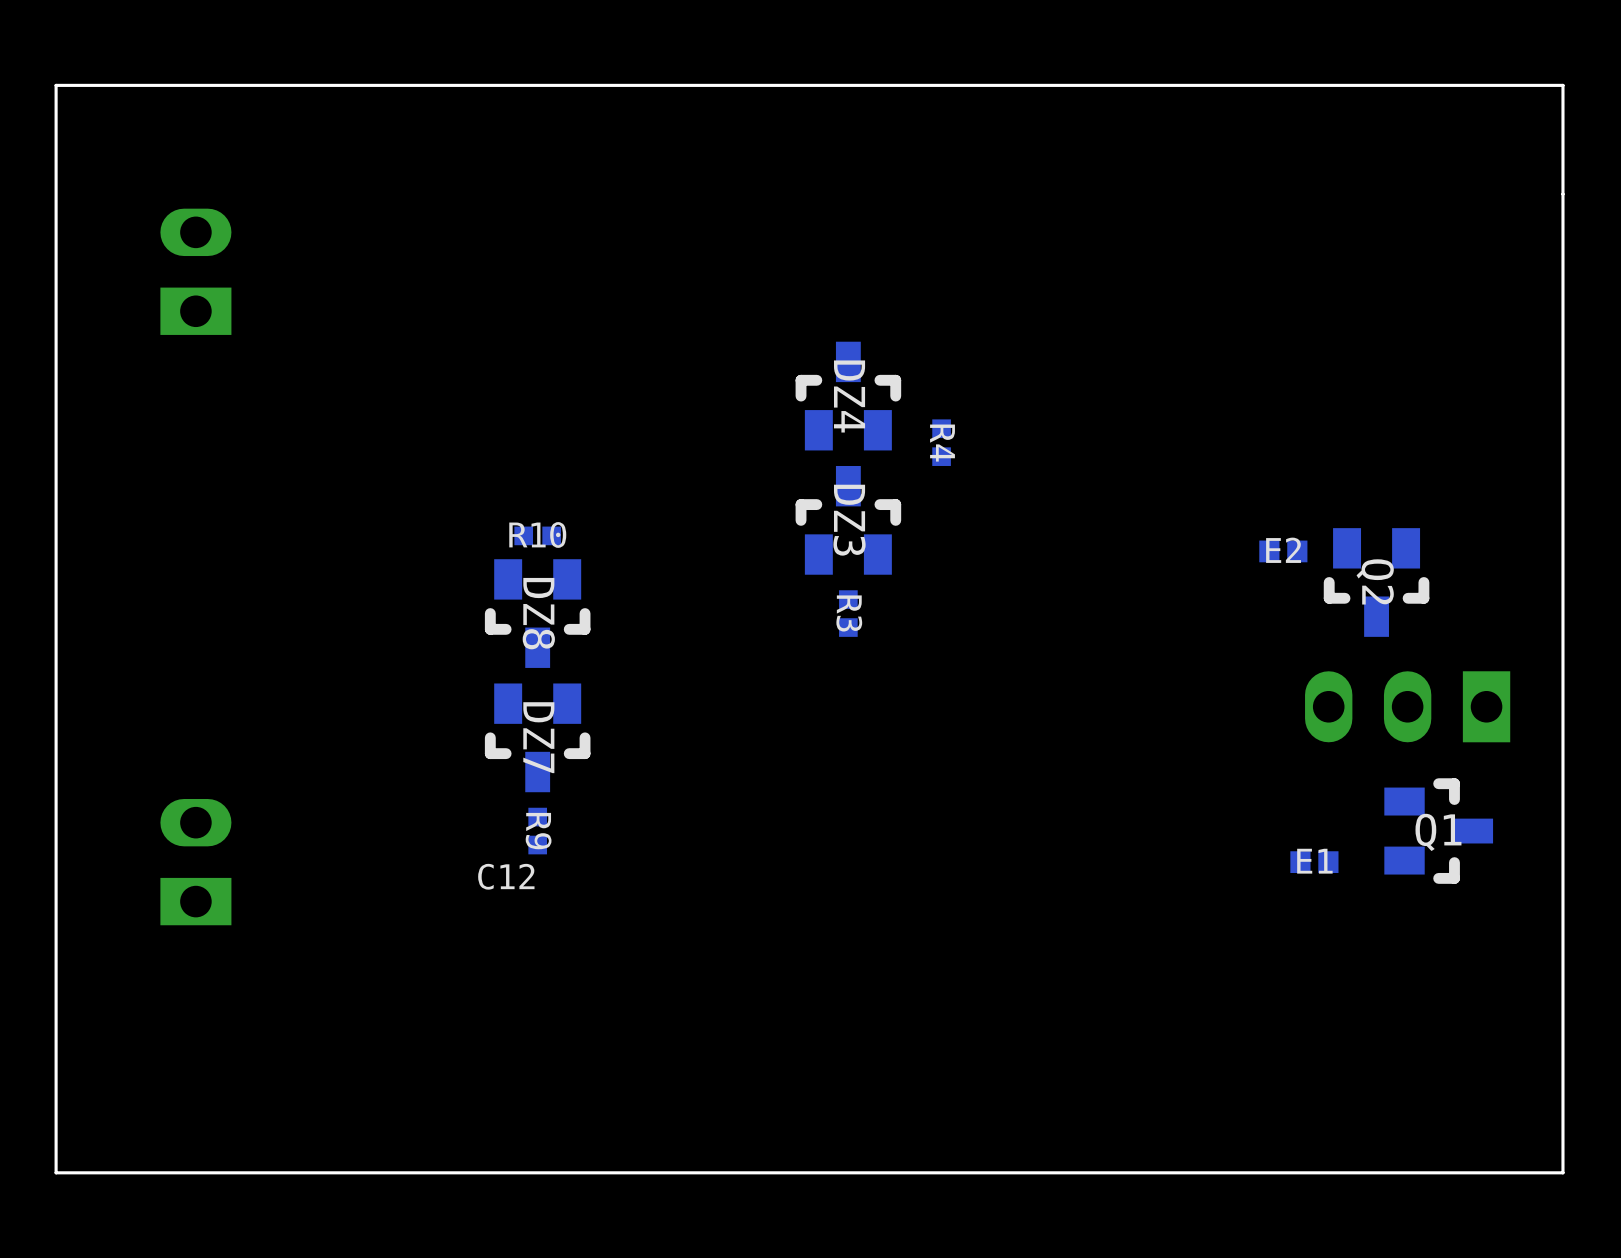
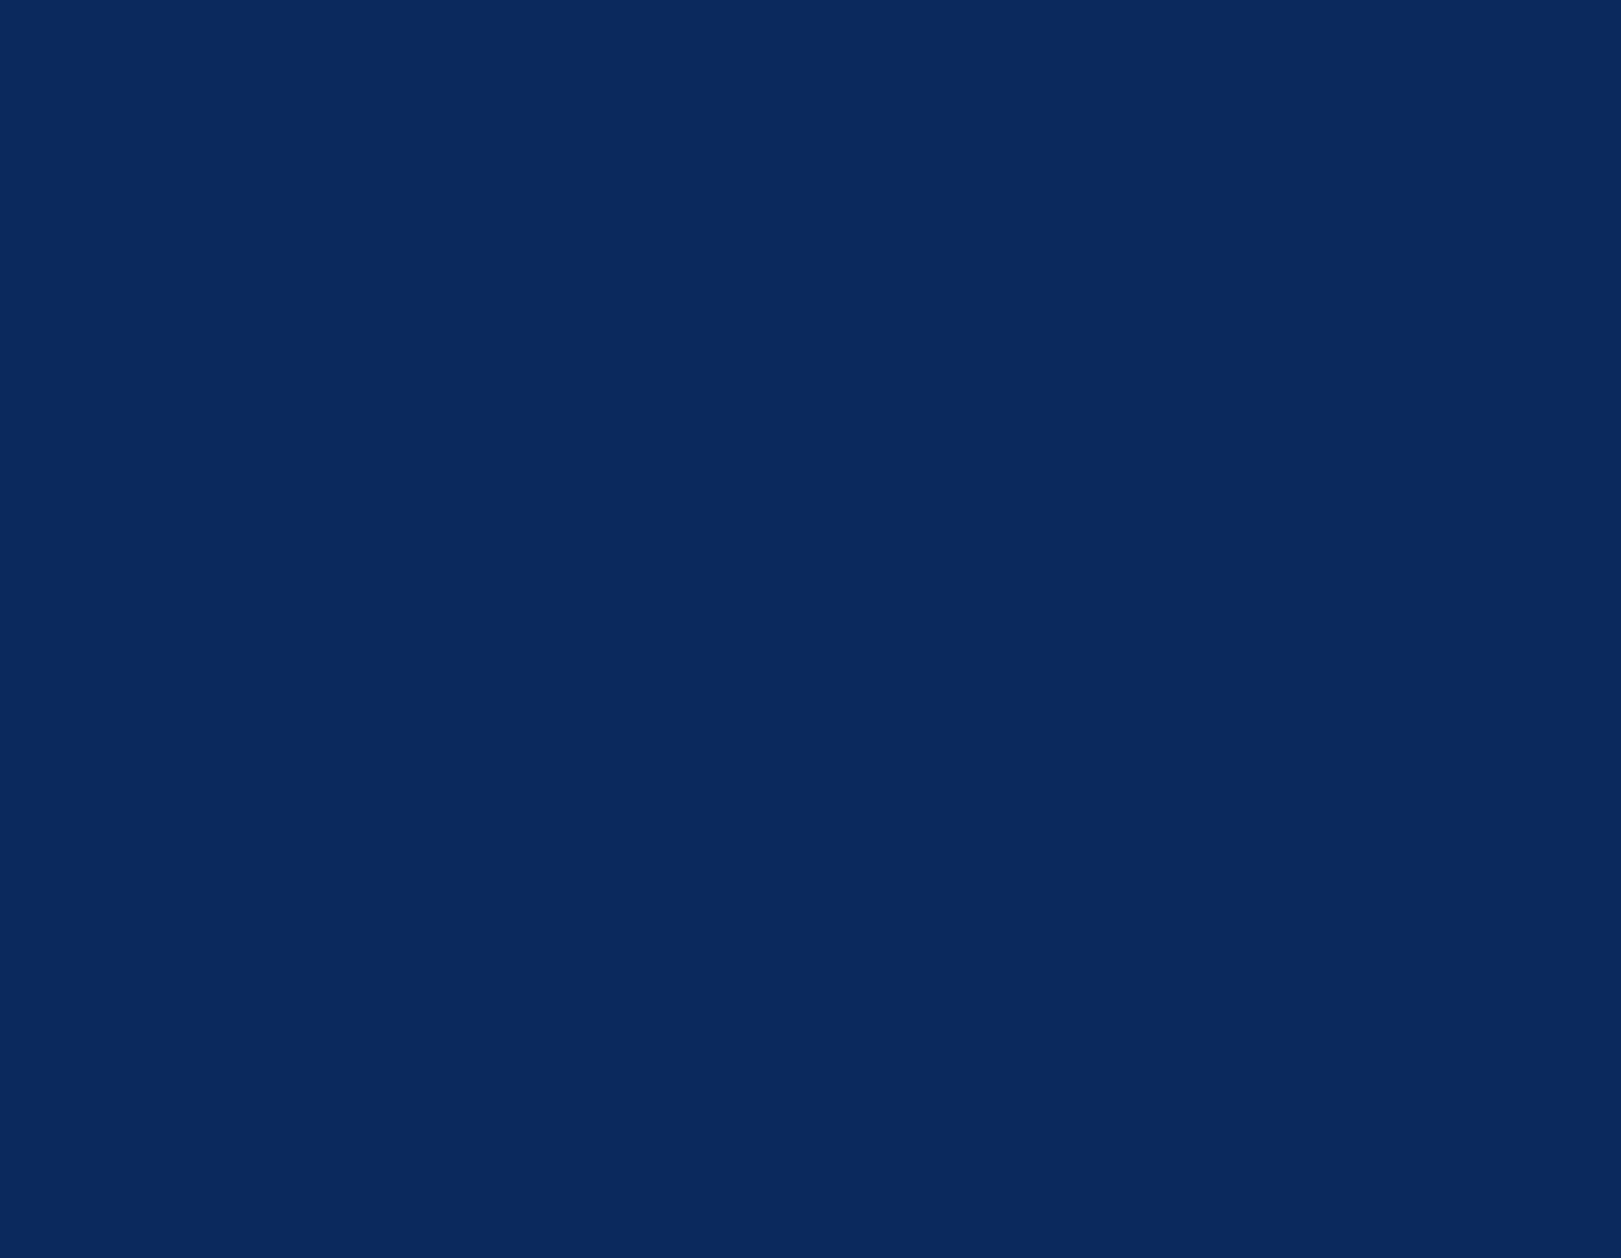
board edge: (1562, 85) (56, 85) (56, 1172) (1562, 1172) (1562, 85) -> none
part: (195, 271) -> none
DZ4: (848, 396) -> none
R4: (941, 442) -> none
DZ3: (848, 520) -> none
R10: (537, 535) -> none
E2: (1283, 551) -> none
Q2: (1376, 582) -> none
DZ8: (537, 613) -> none
R3: (848, 613) -> none
part: (1407, 706) -> none
DZ7: (537, 737) -> none
R9: (537, 831) -> none
Q1: (1438, 831) -> none
part: (195, 862) -> none
E1: (1314, 862) -> none
C12: (506, 876) -> none

